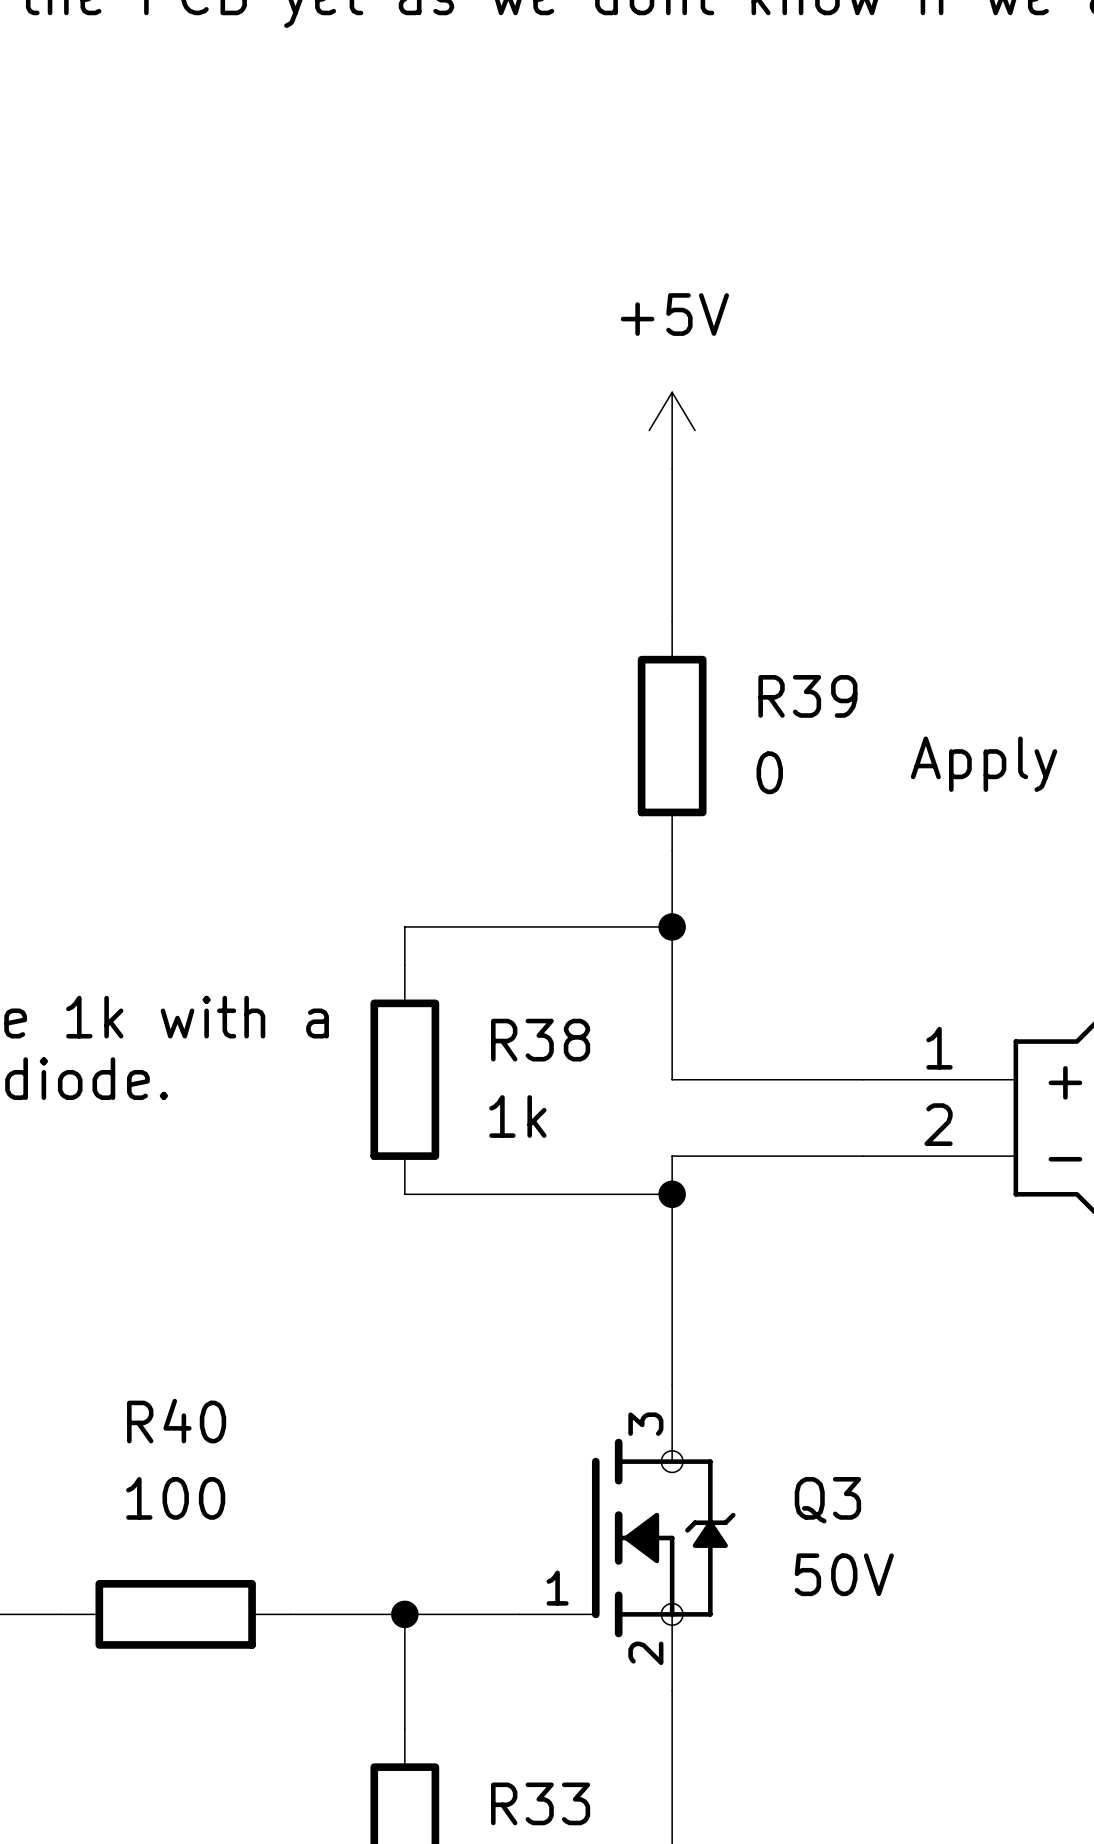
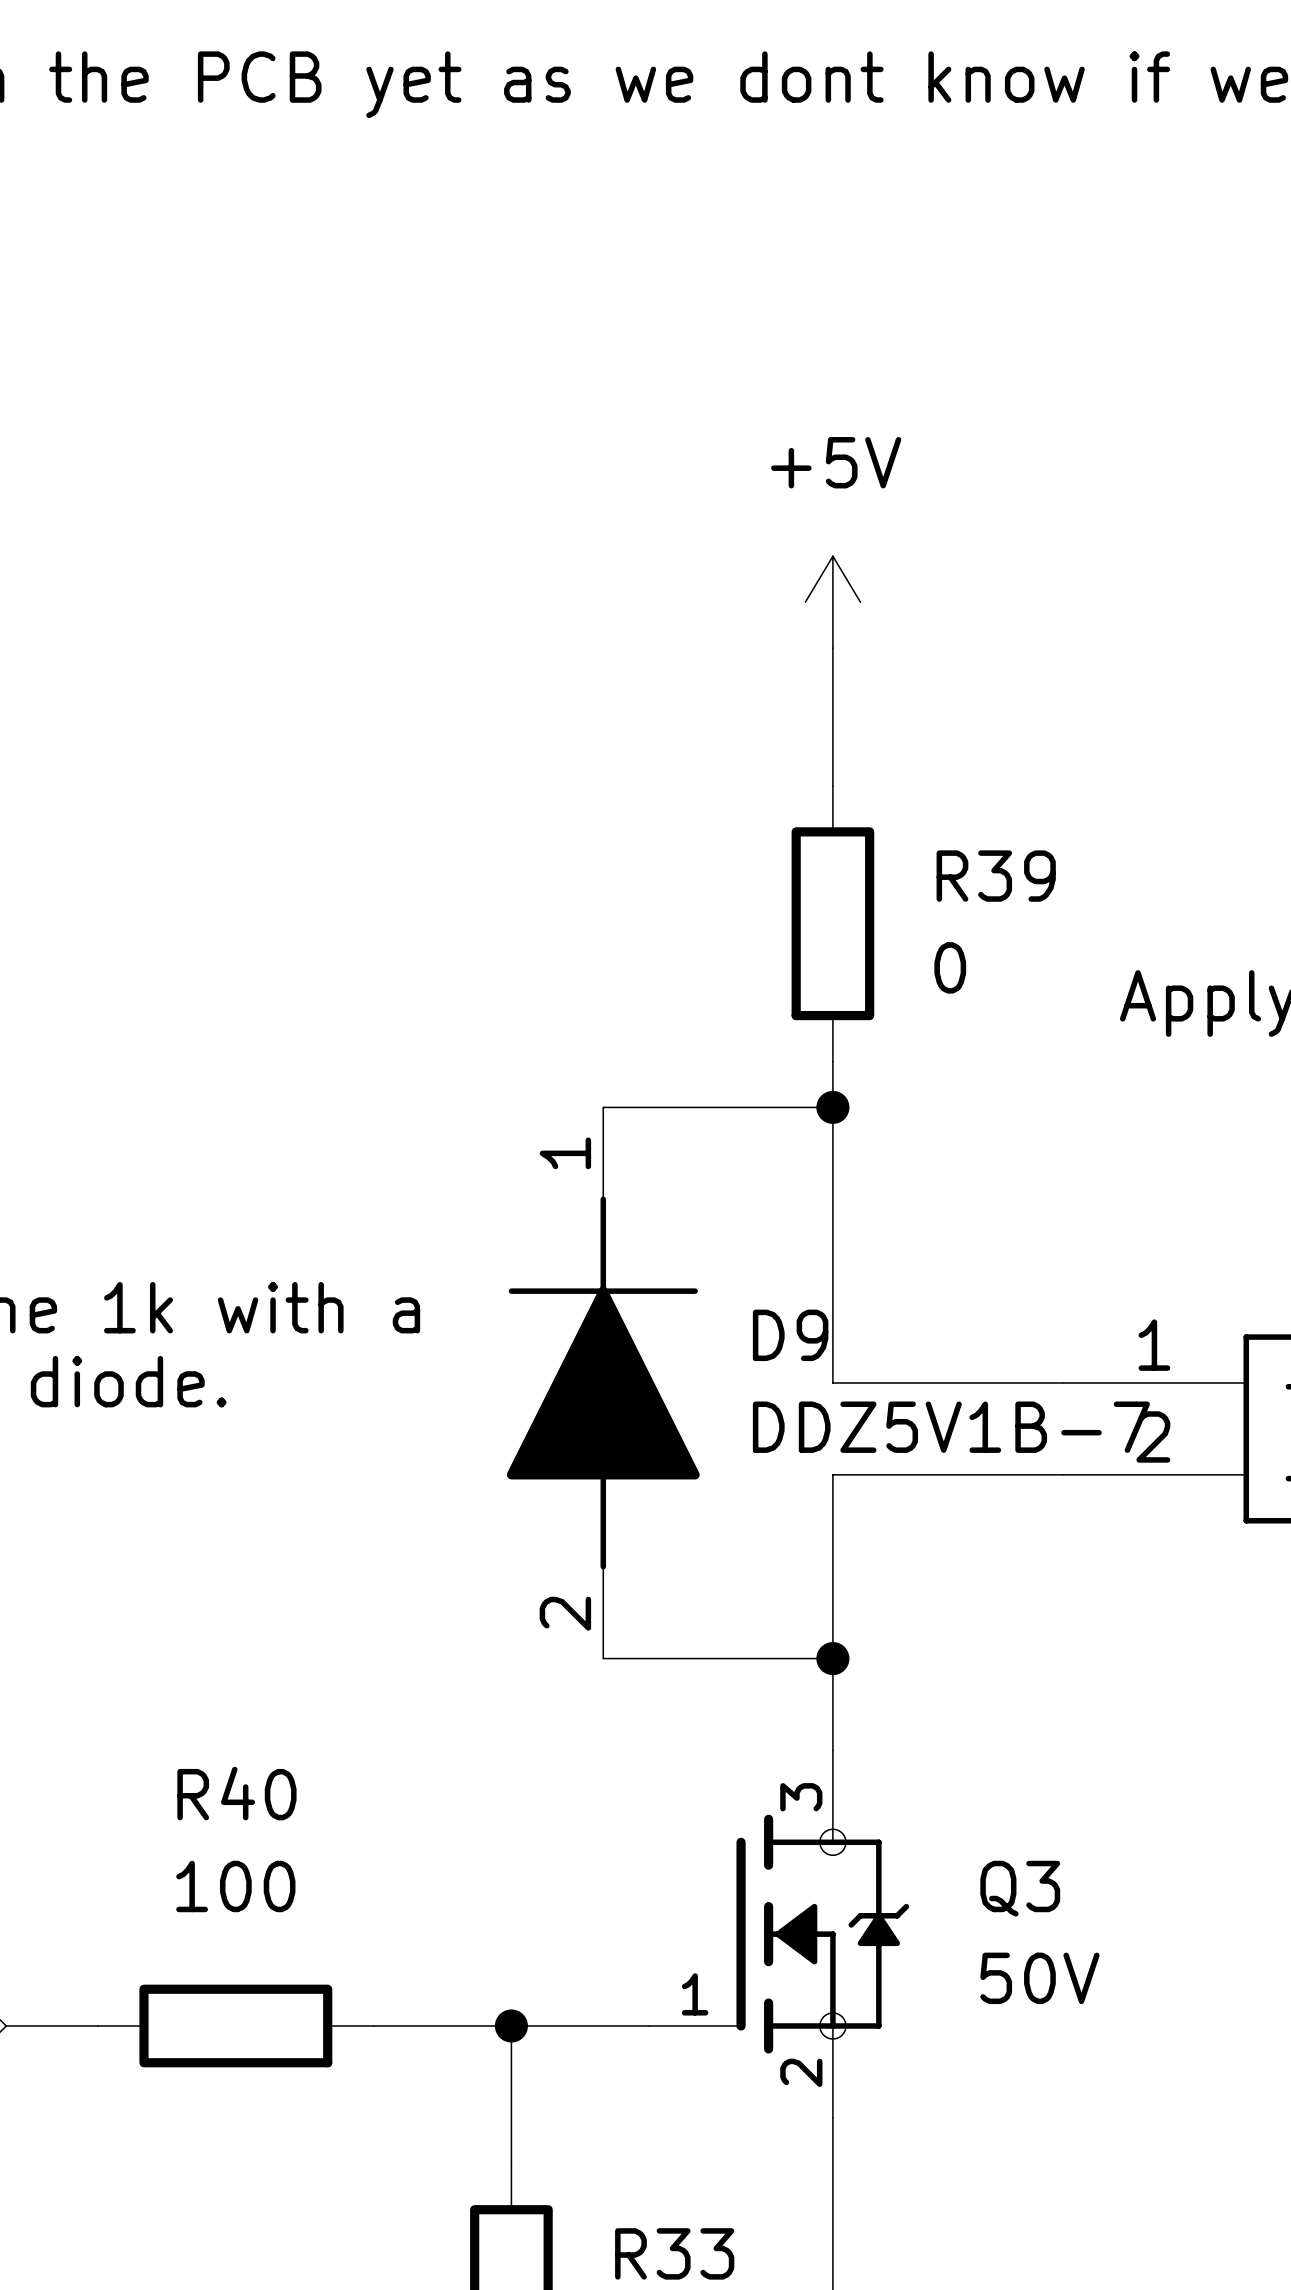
R39 position: (672, 736) -> (832, 923)
wire: none -> (832, 1061) (832, 1107) (603, 1107)
wire: (672, 926) (404, 926) (404, 965) -> none
junction position: (672, 926) -> (832, 1107)
R38: 1k (404, 1079) -> none
D9: none -> DDZ5V1B-7 (603, 1383)
wire: (404, 1194) (672, 1194) -> none
junction position: (672, 1194) -> (832, 1658)
wire: none -> (603, 1658) (832, 1658)

